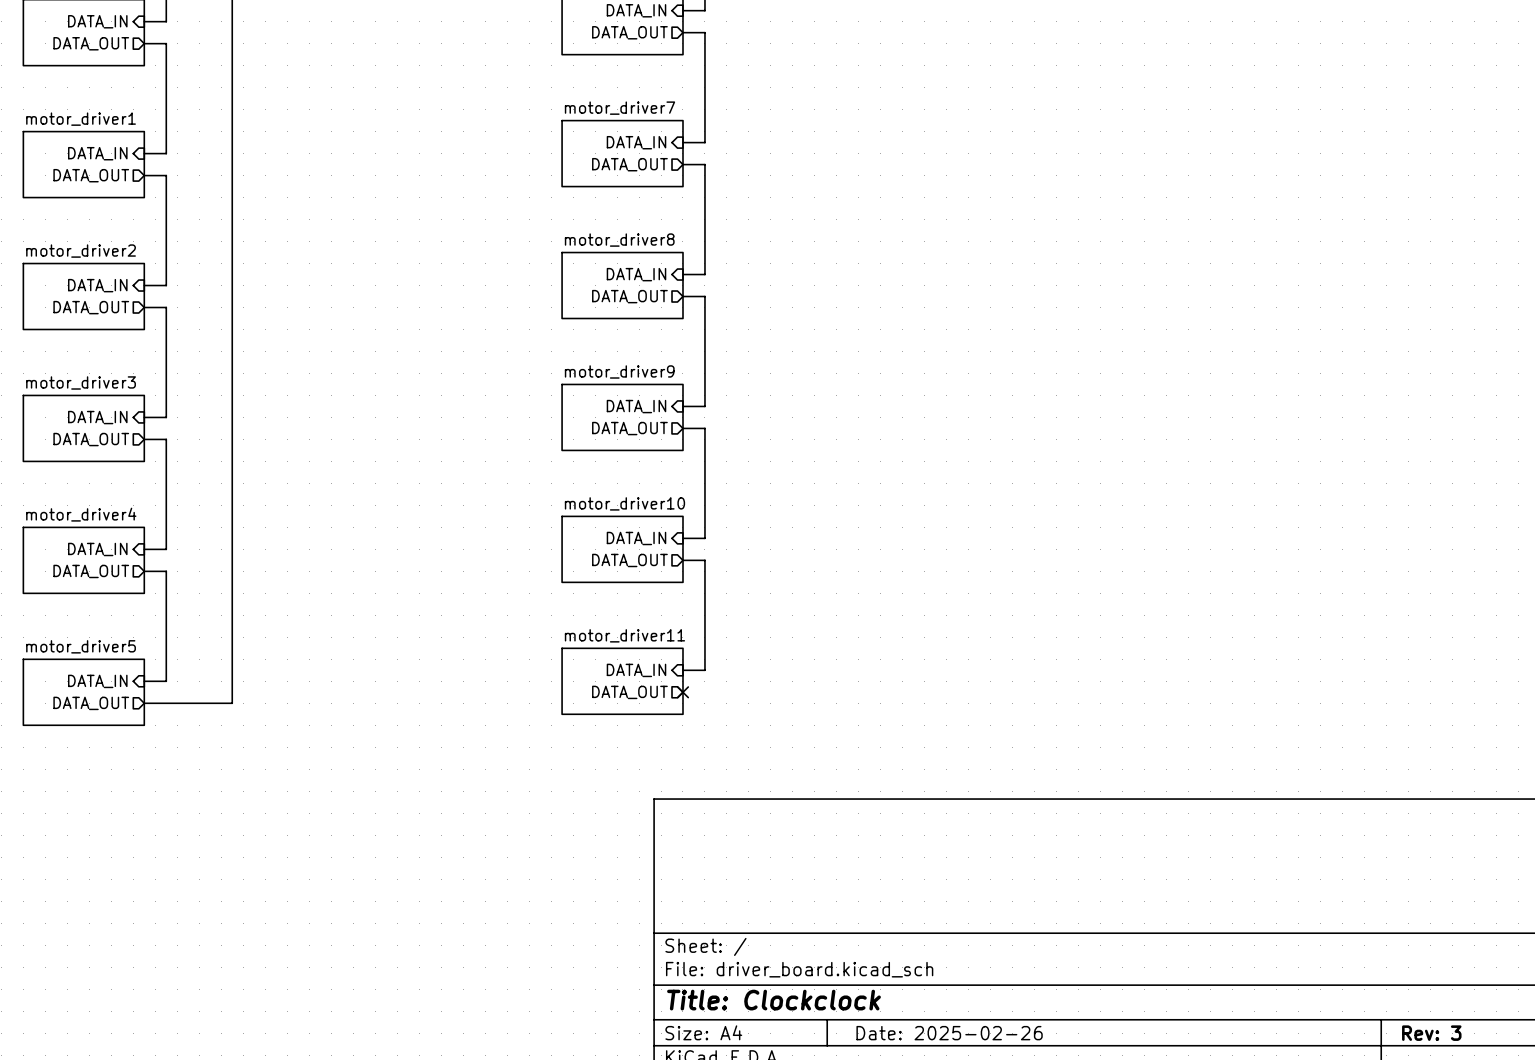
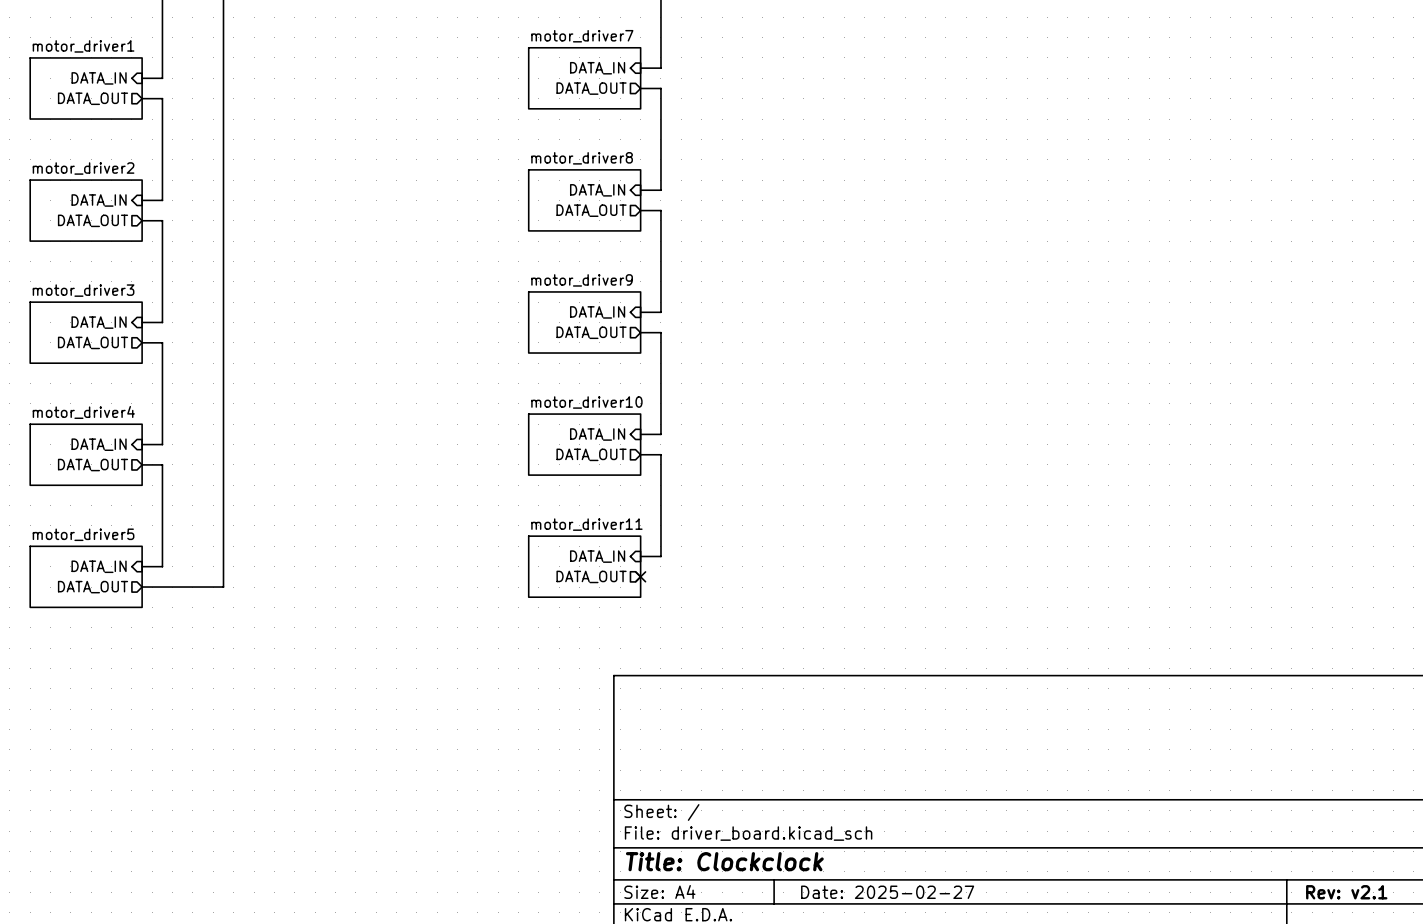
title block: Date: 2025-02-26 (949, 1033) -> Date: 2025-02-27 (887, 892)
title block: Rev: 3 (1431, 1033) -> Rev: v2.1 (1346, 892)

